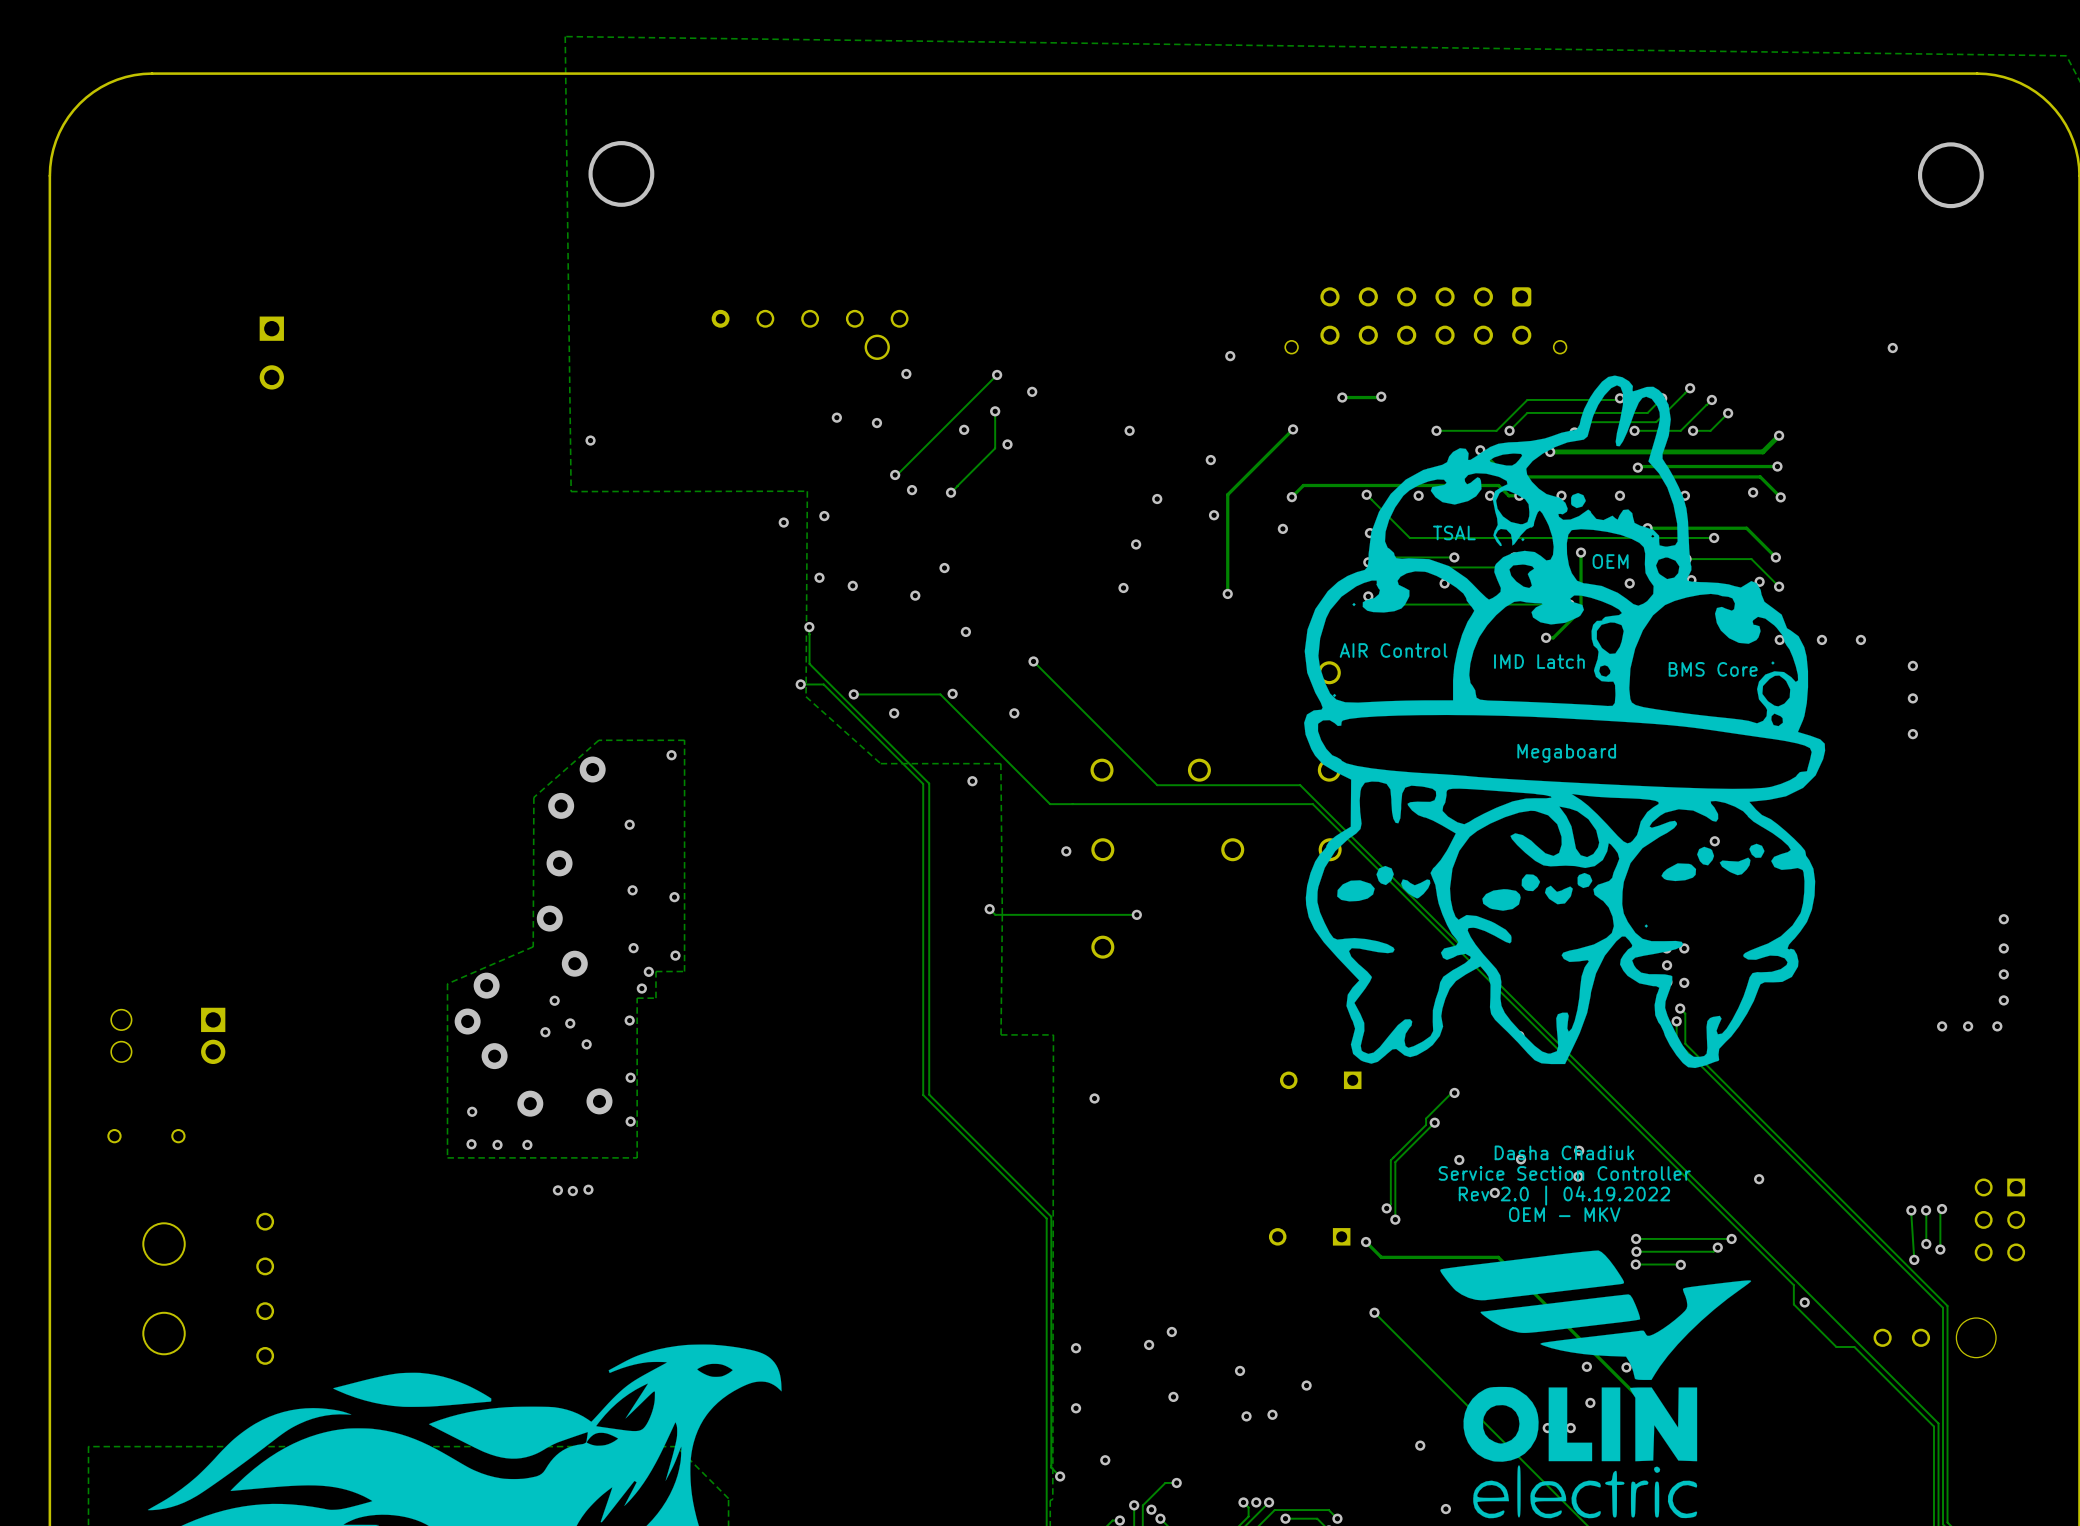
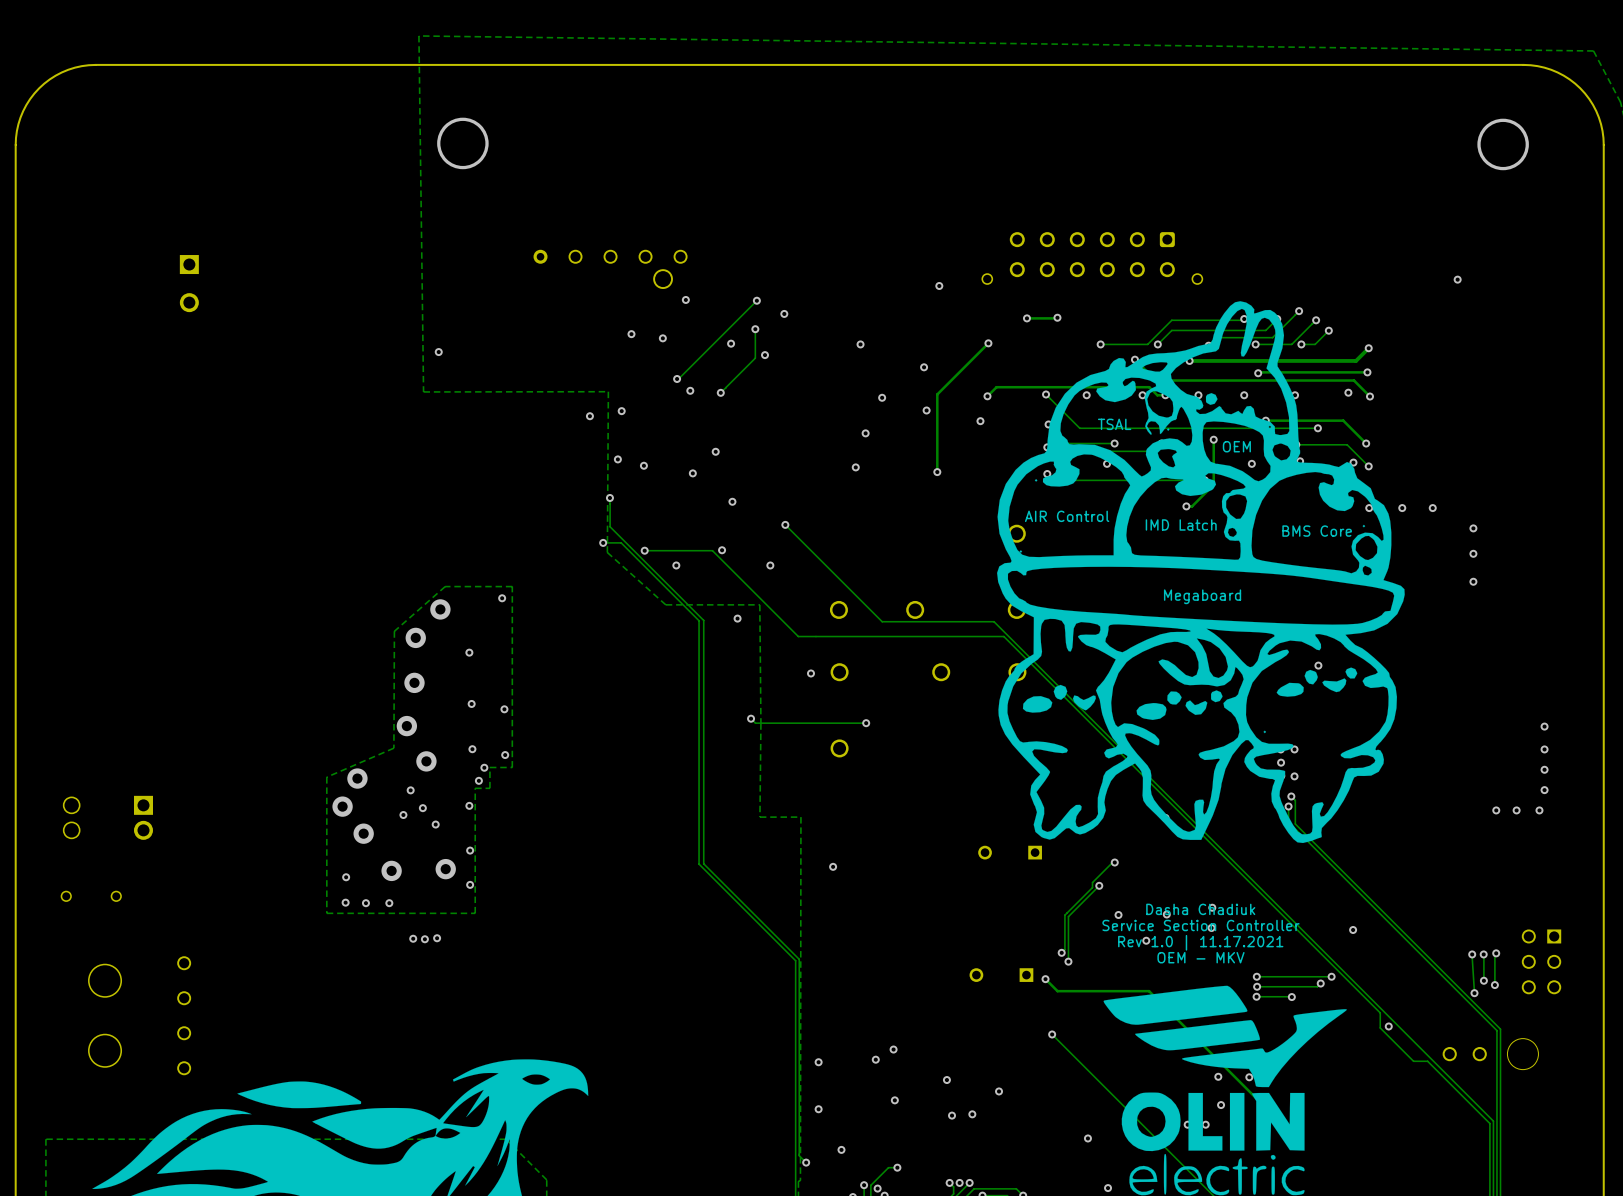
text: Rev 2.0 | 04.19.2022 (1564, 1195) -> Rev 1.0 | 11.17.2021 (1200, 942)

